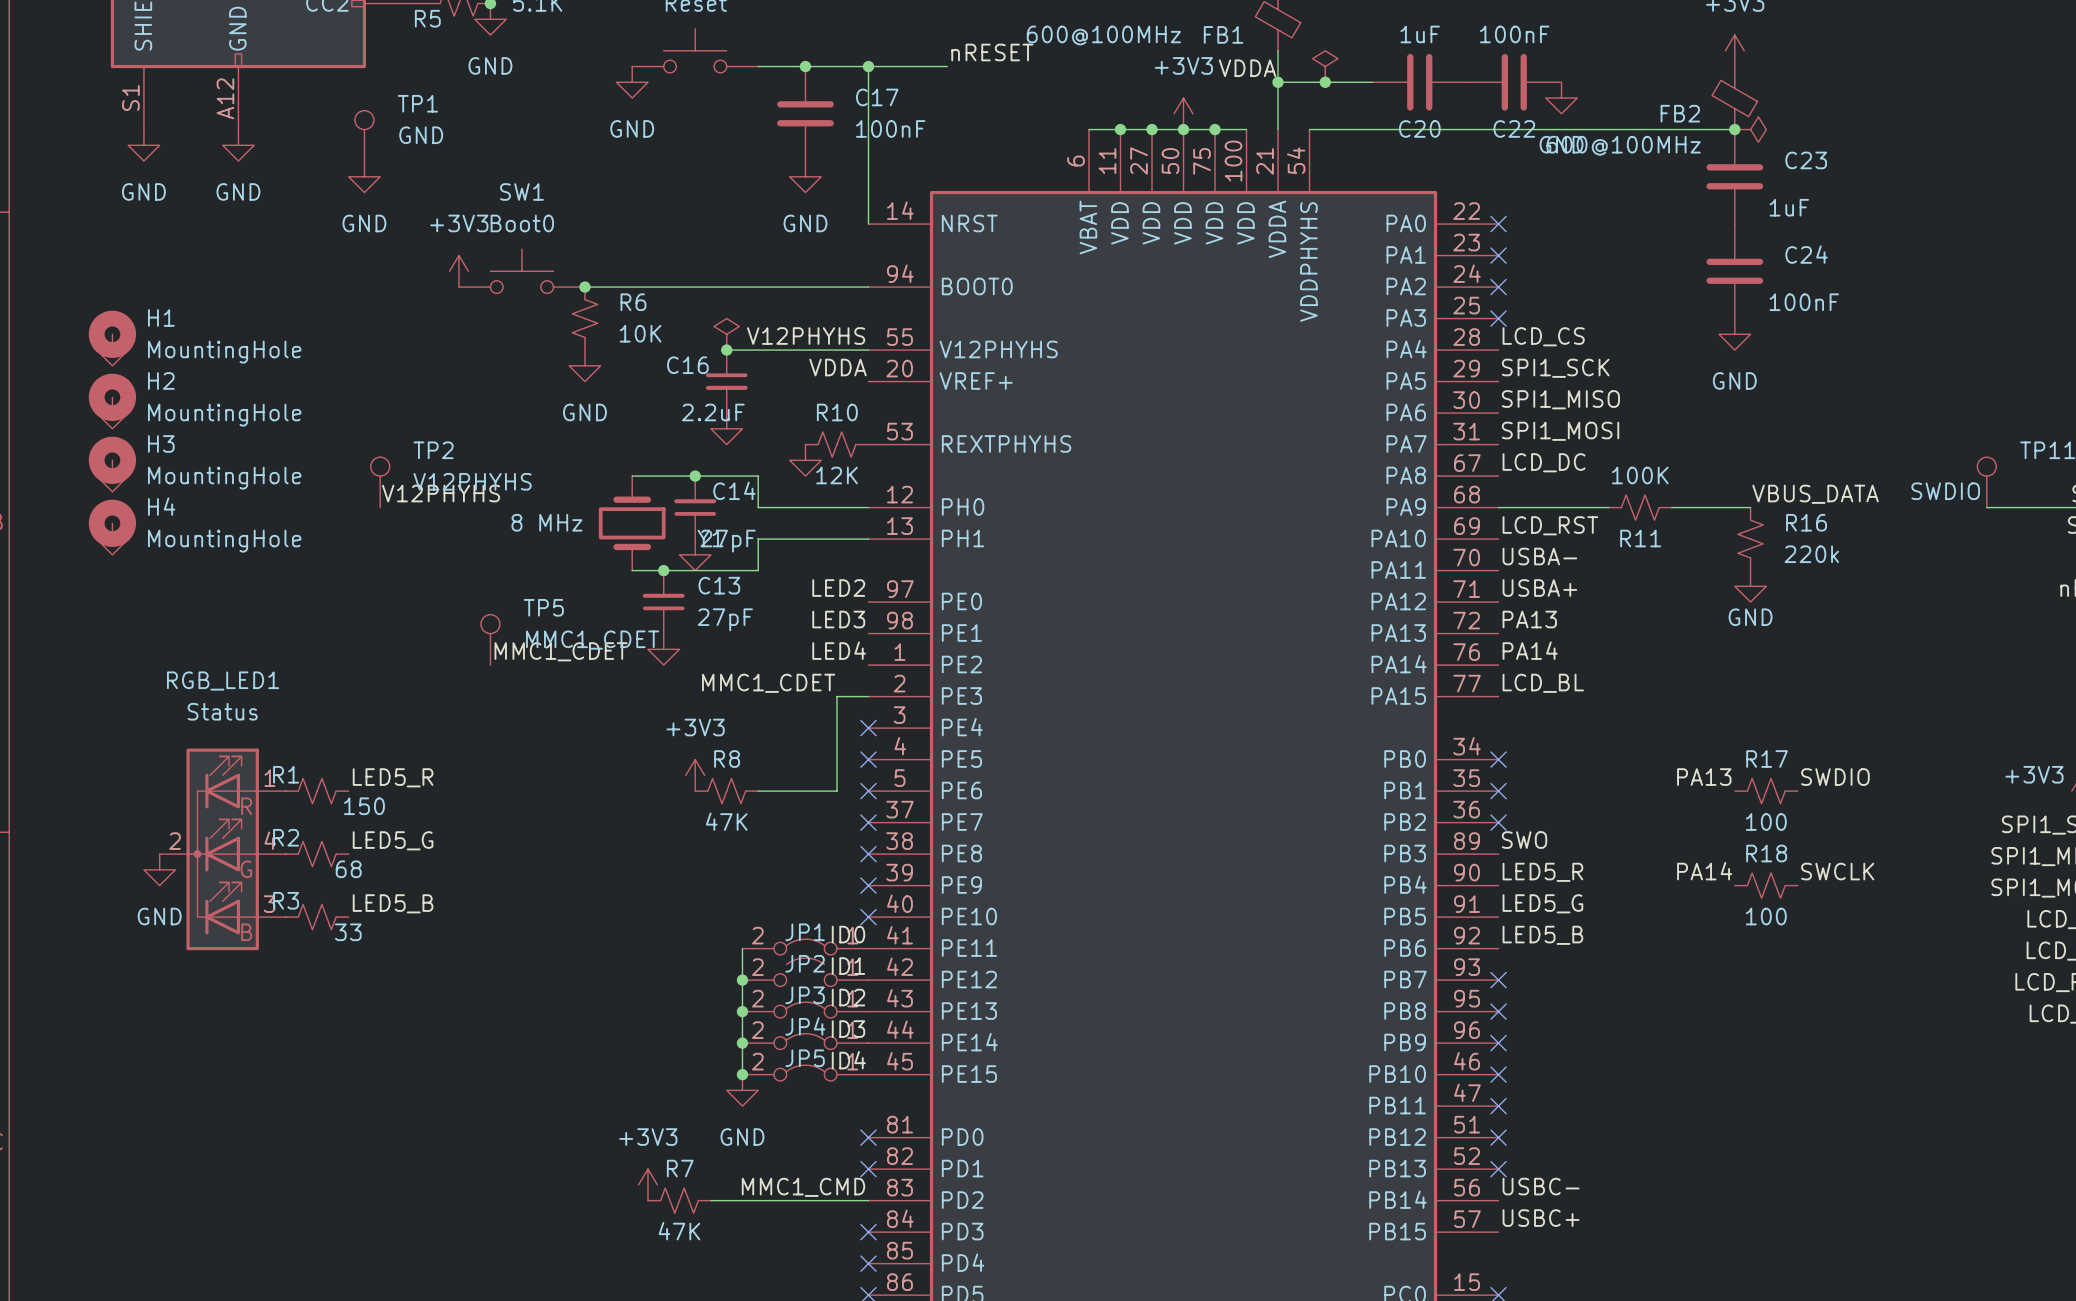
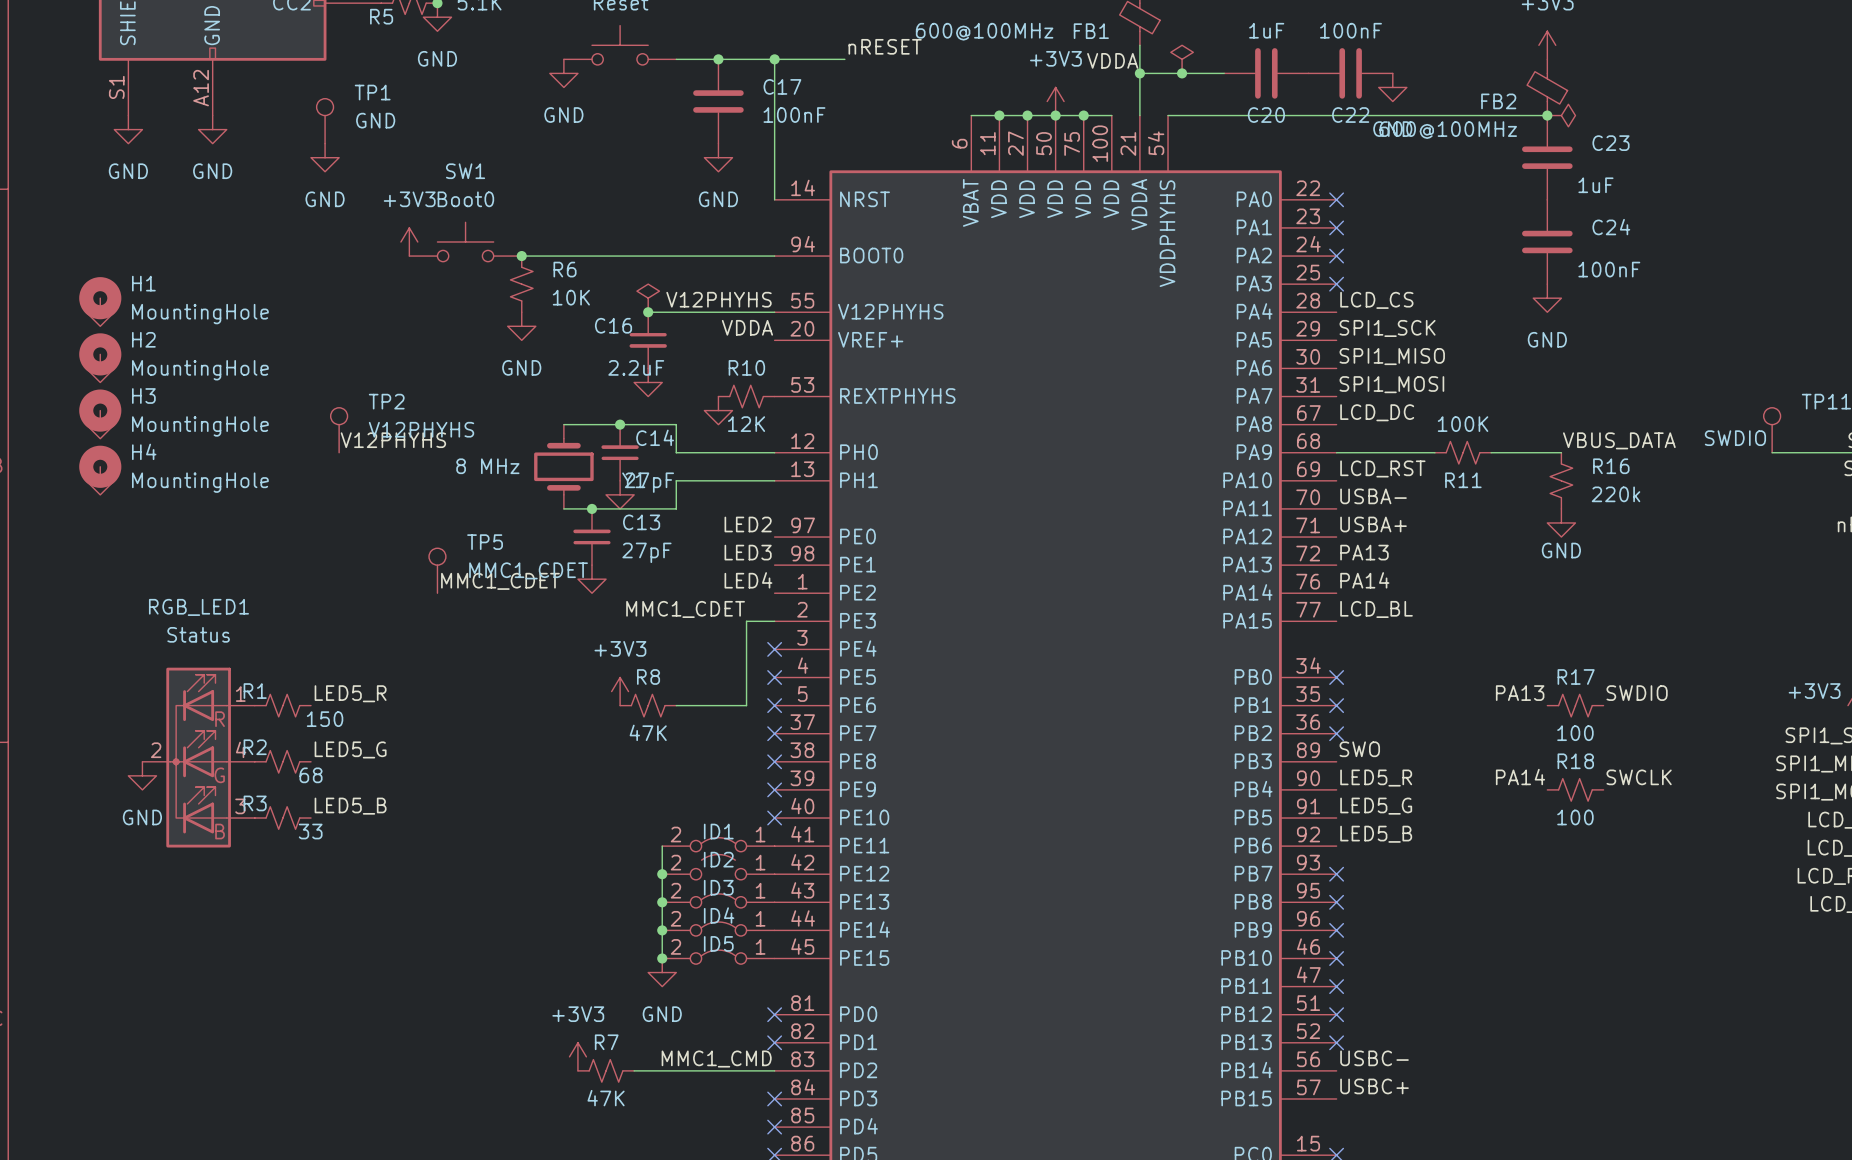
JP1 name: JP1 (805, 932) -> ID1 (718, 831)
label: ID0 (848, 934) -> none
JP2 name: JP2 (805, 963) -> ID2 (718, 859)
label: ID1 (848, 966) -> none
JP3 name: JP3 (805, 995) -> ID3 (718, 887)
label: ID2 (848, 997) -> none
JP4 name: JP4 (805, 1026) -> ID4 (719, 915)
label: ID3 (848, 1029) -> none
JP5 name: JP5 (805, 1058) -> ID5 (718, 943)
label: ID4 (848, 1060) -> none

